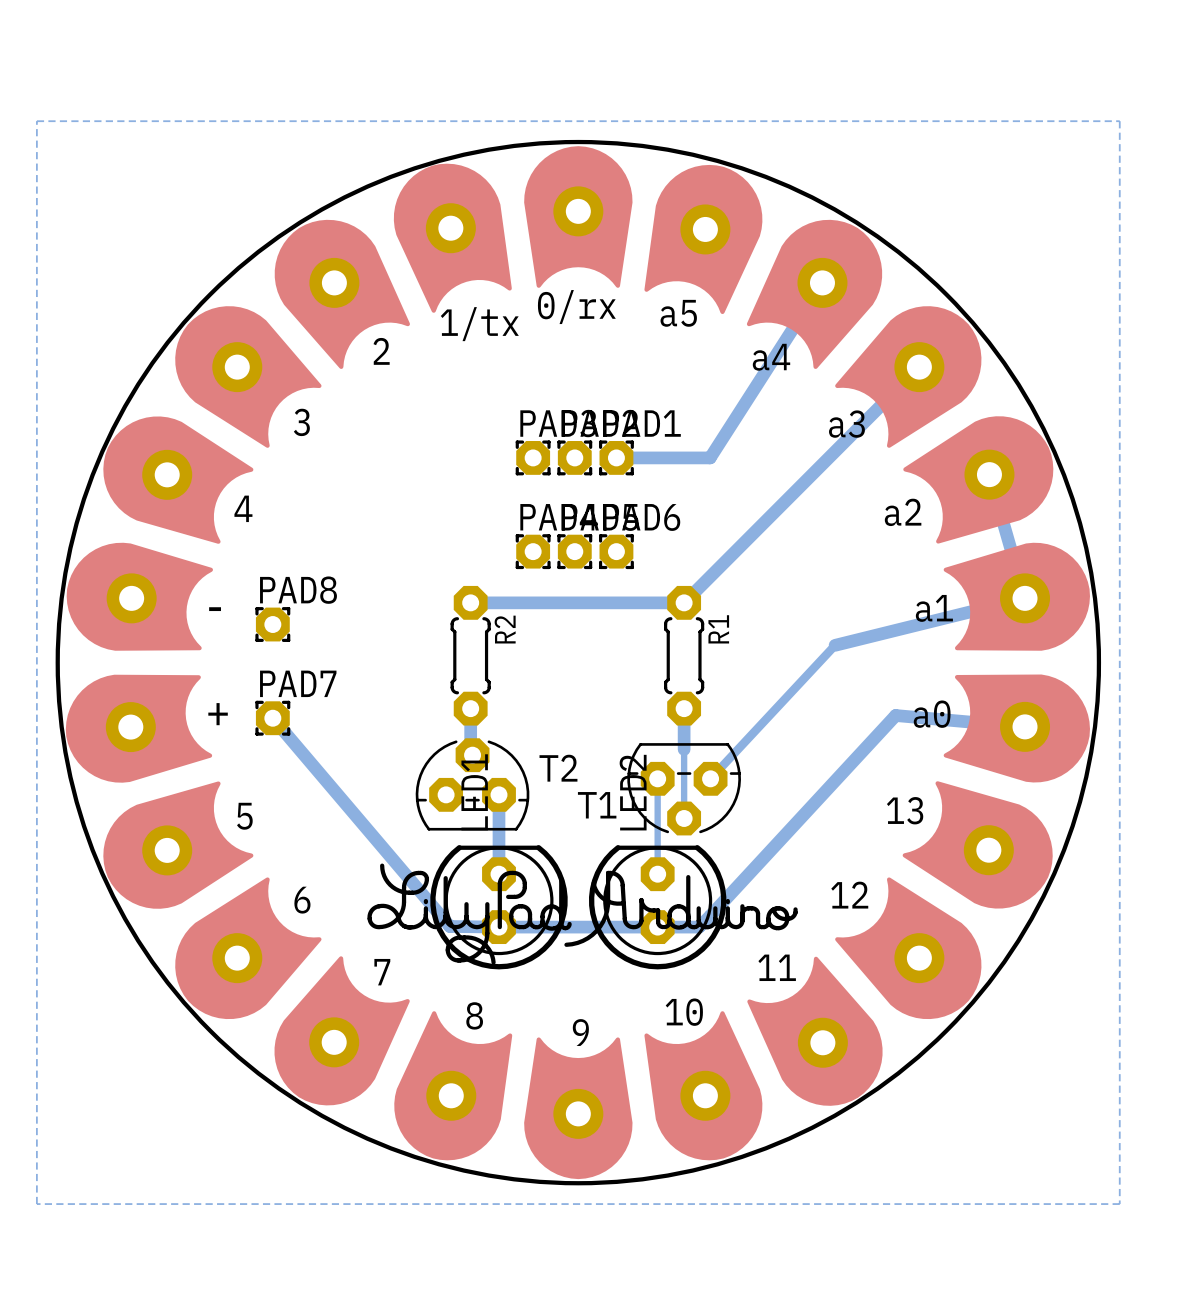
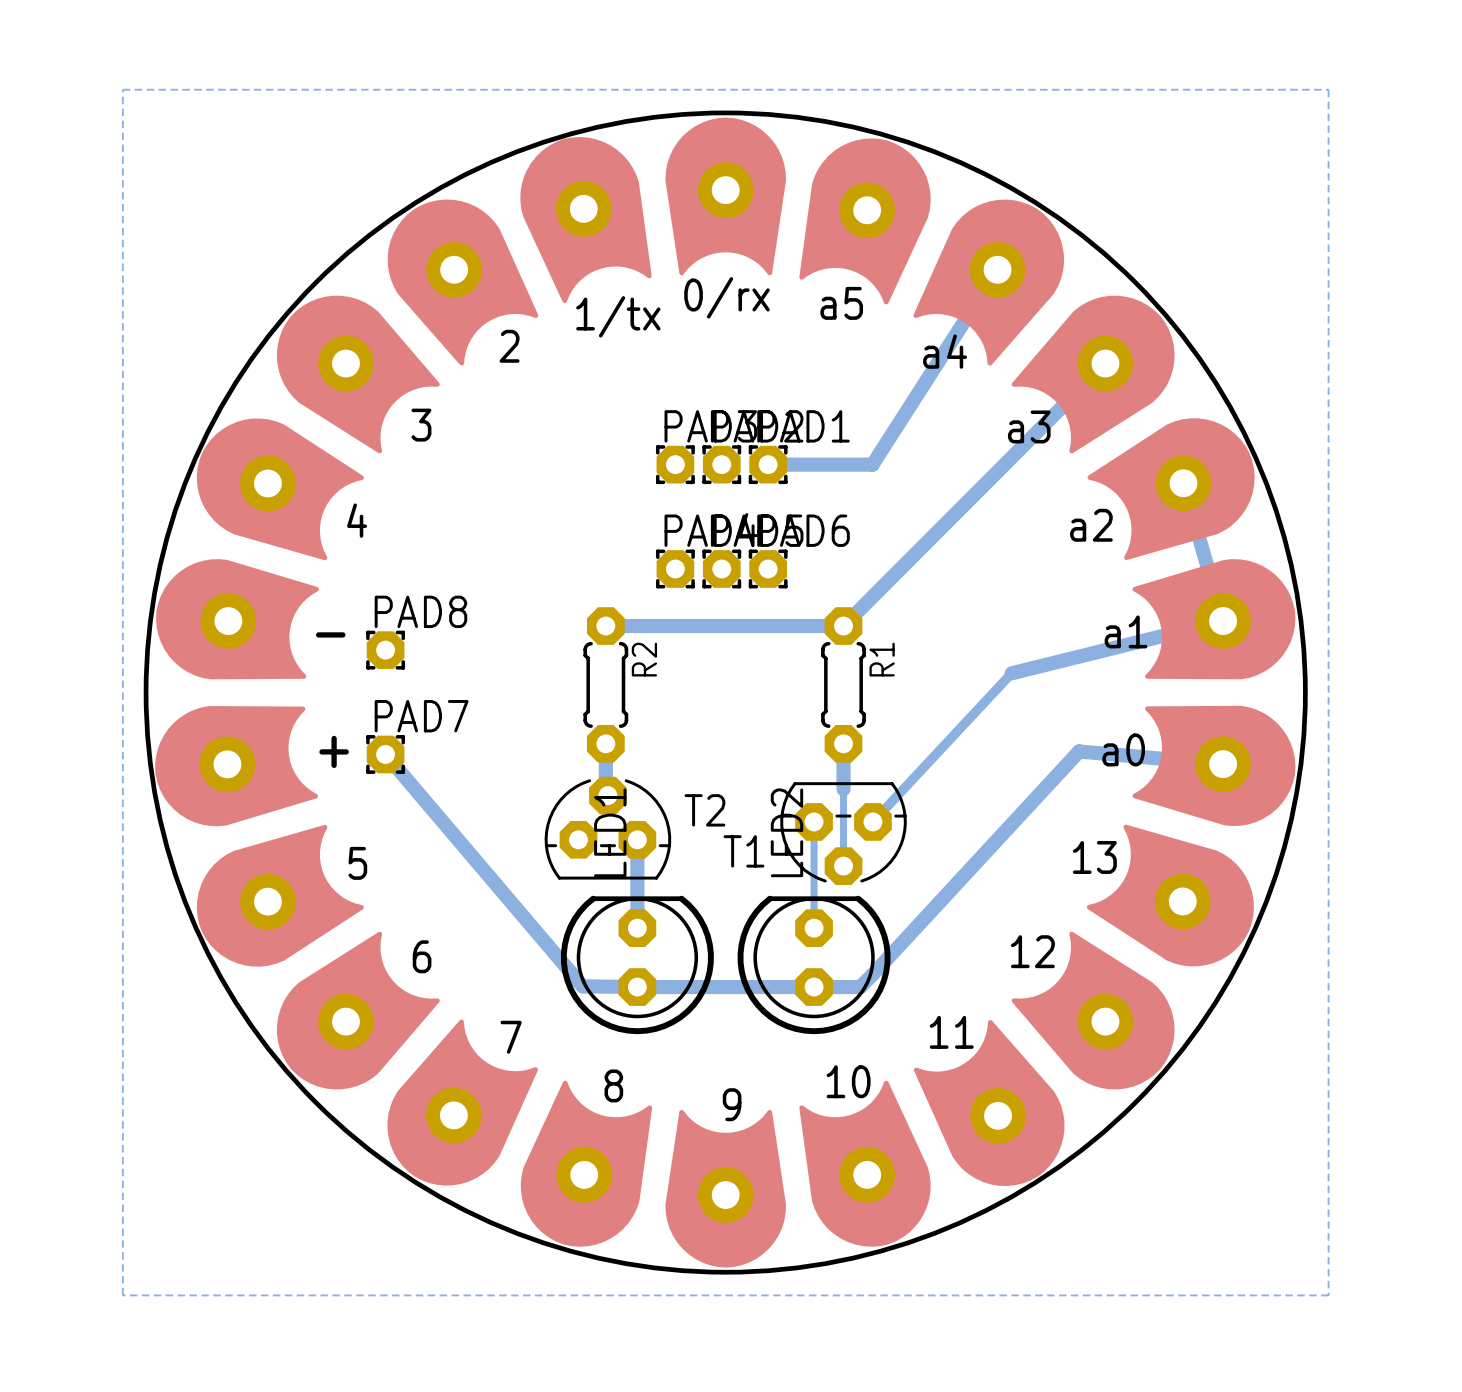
drawing: [367, 863, 798, 965] -> none

